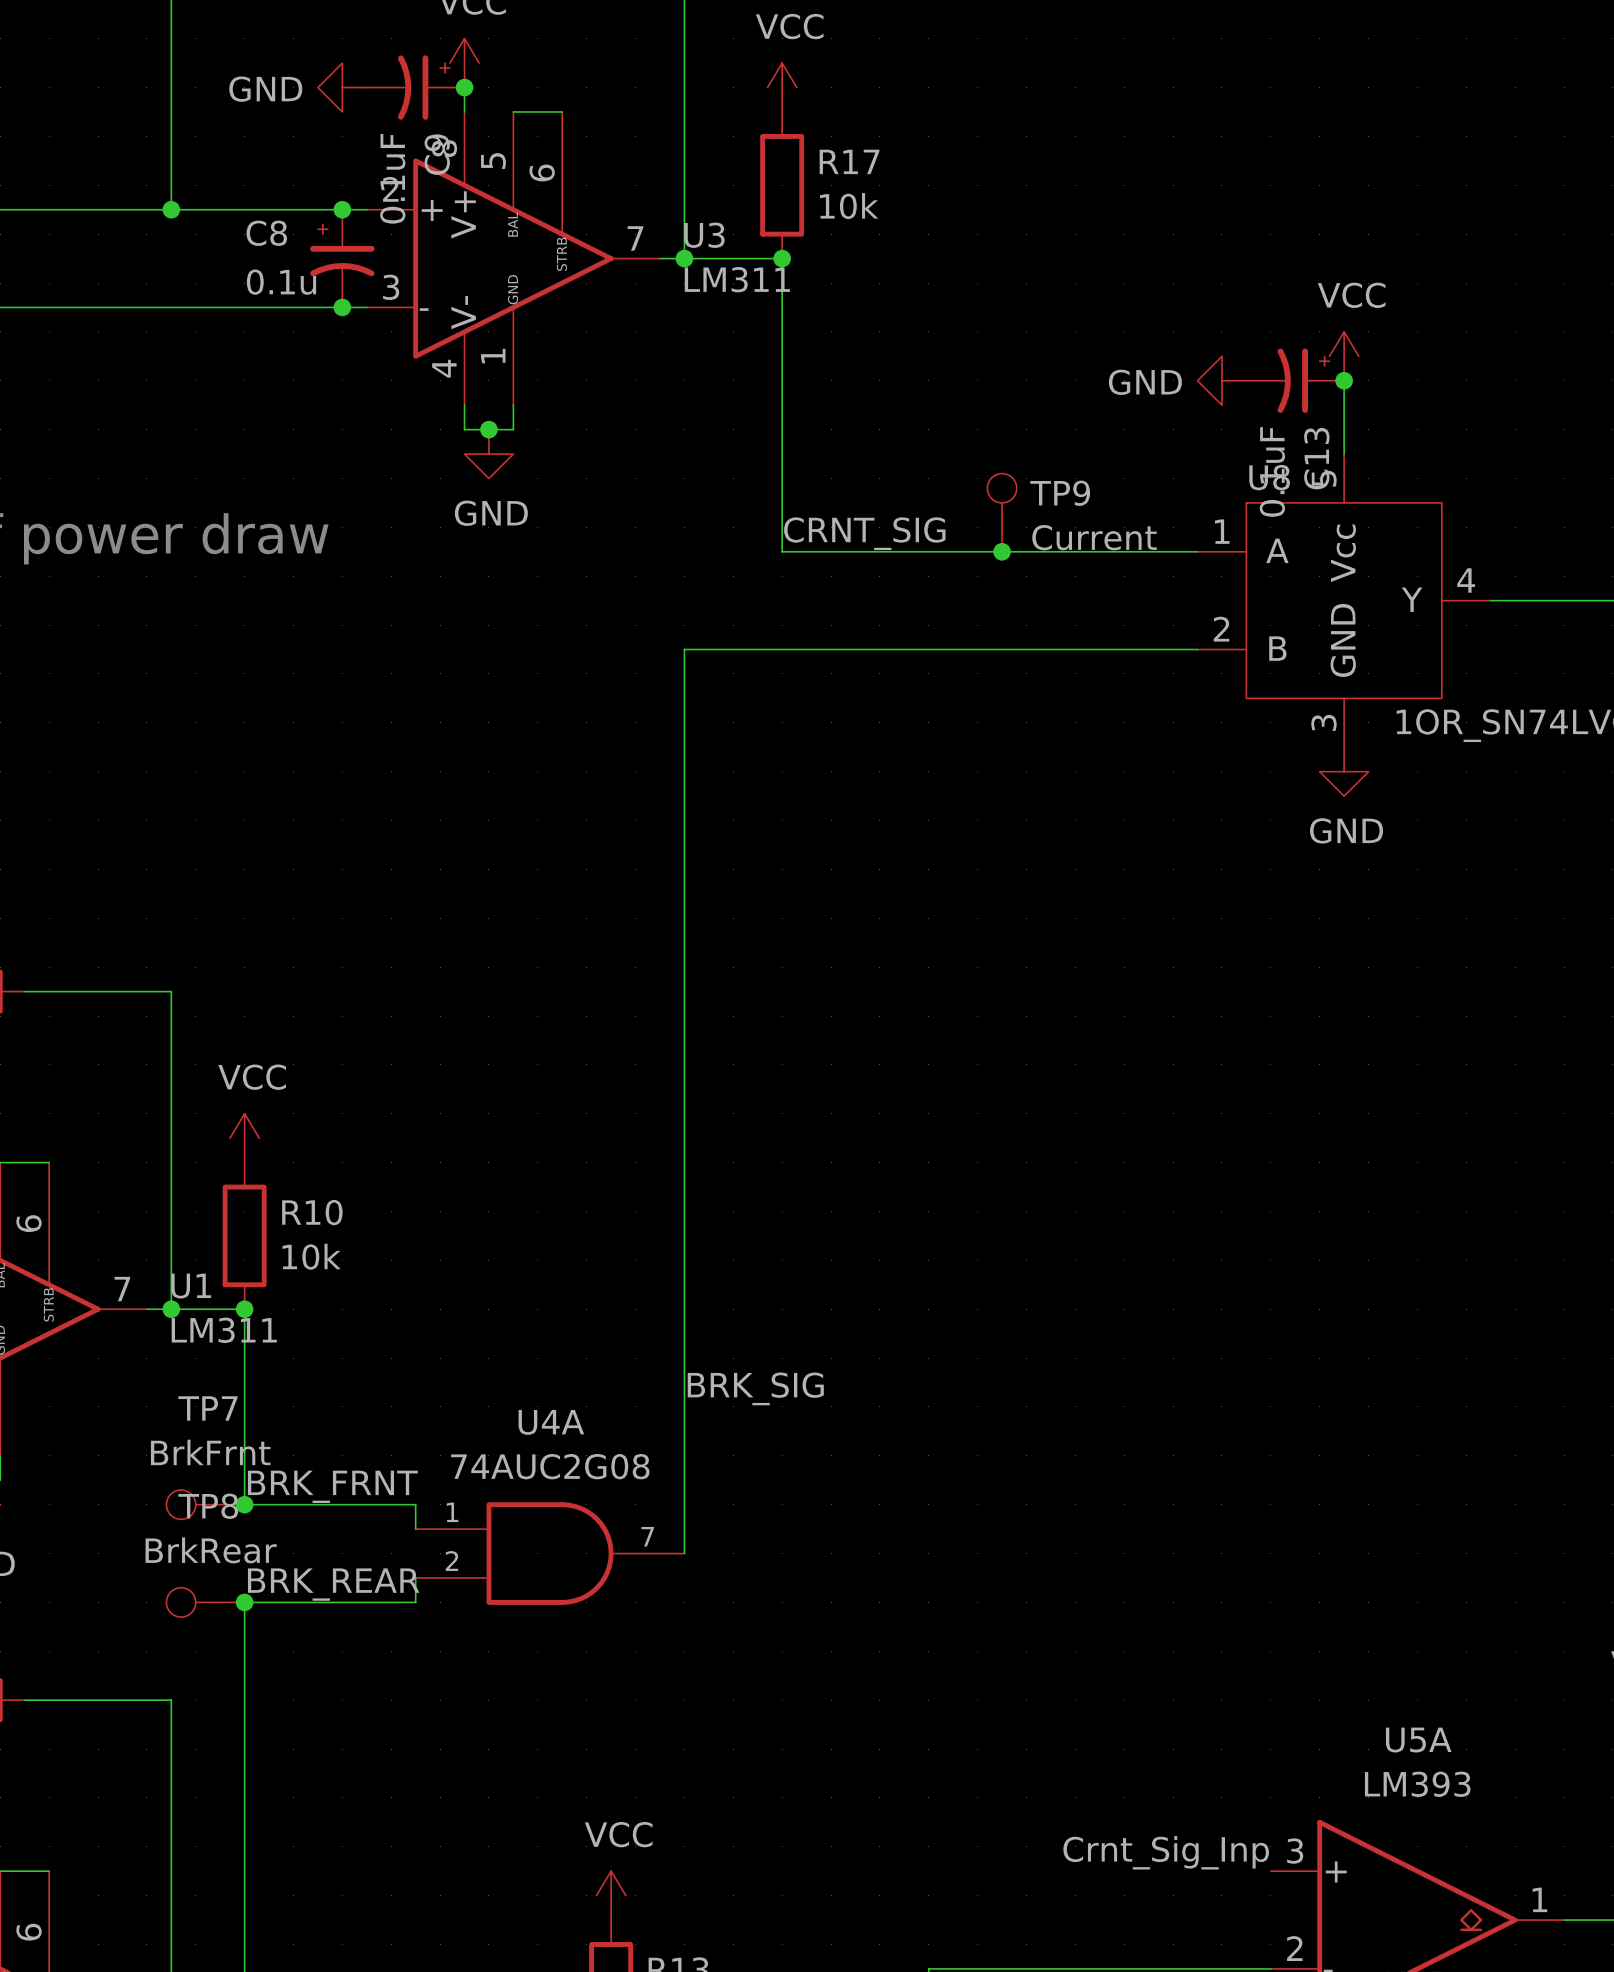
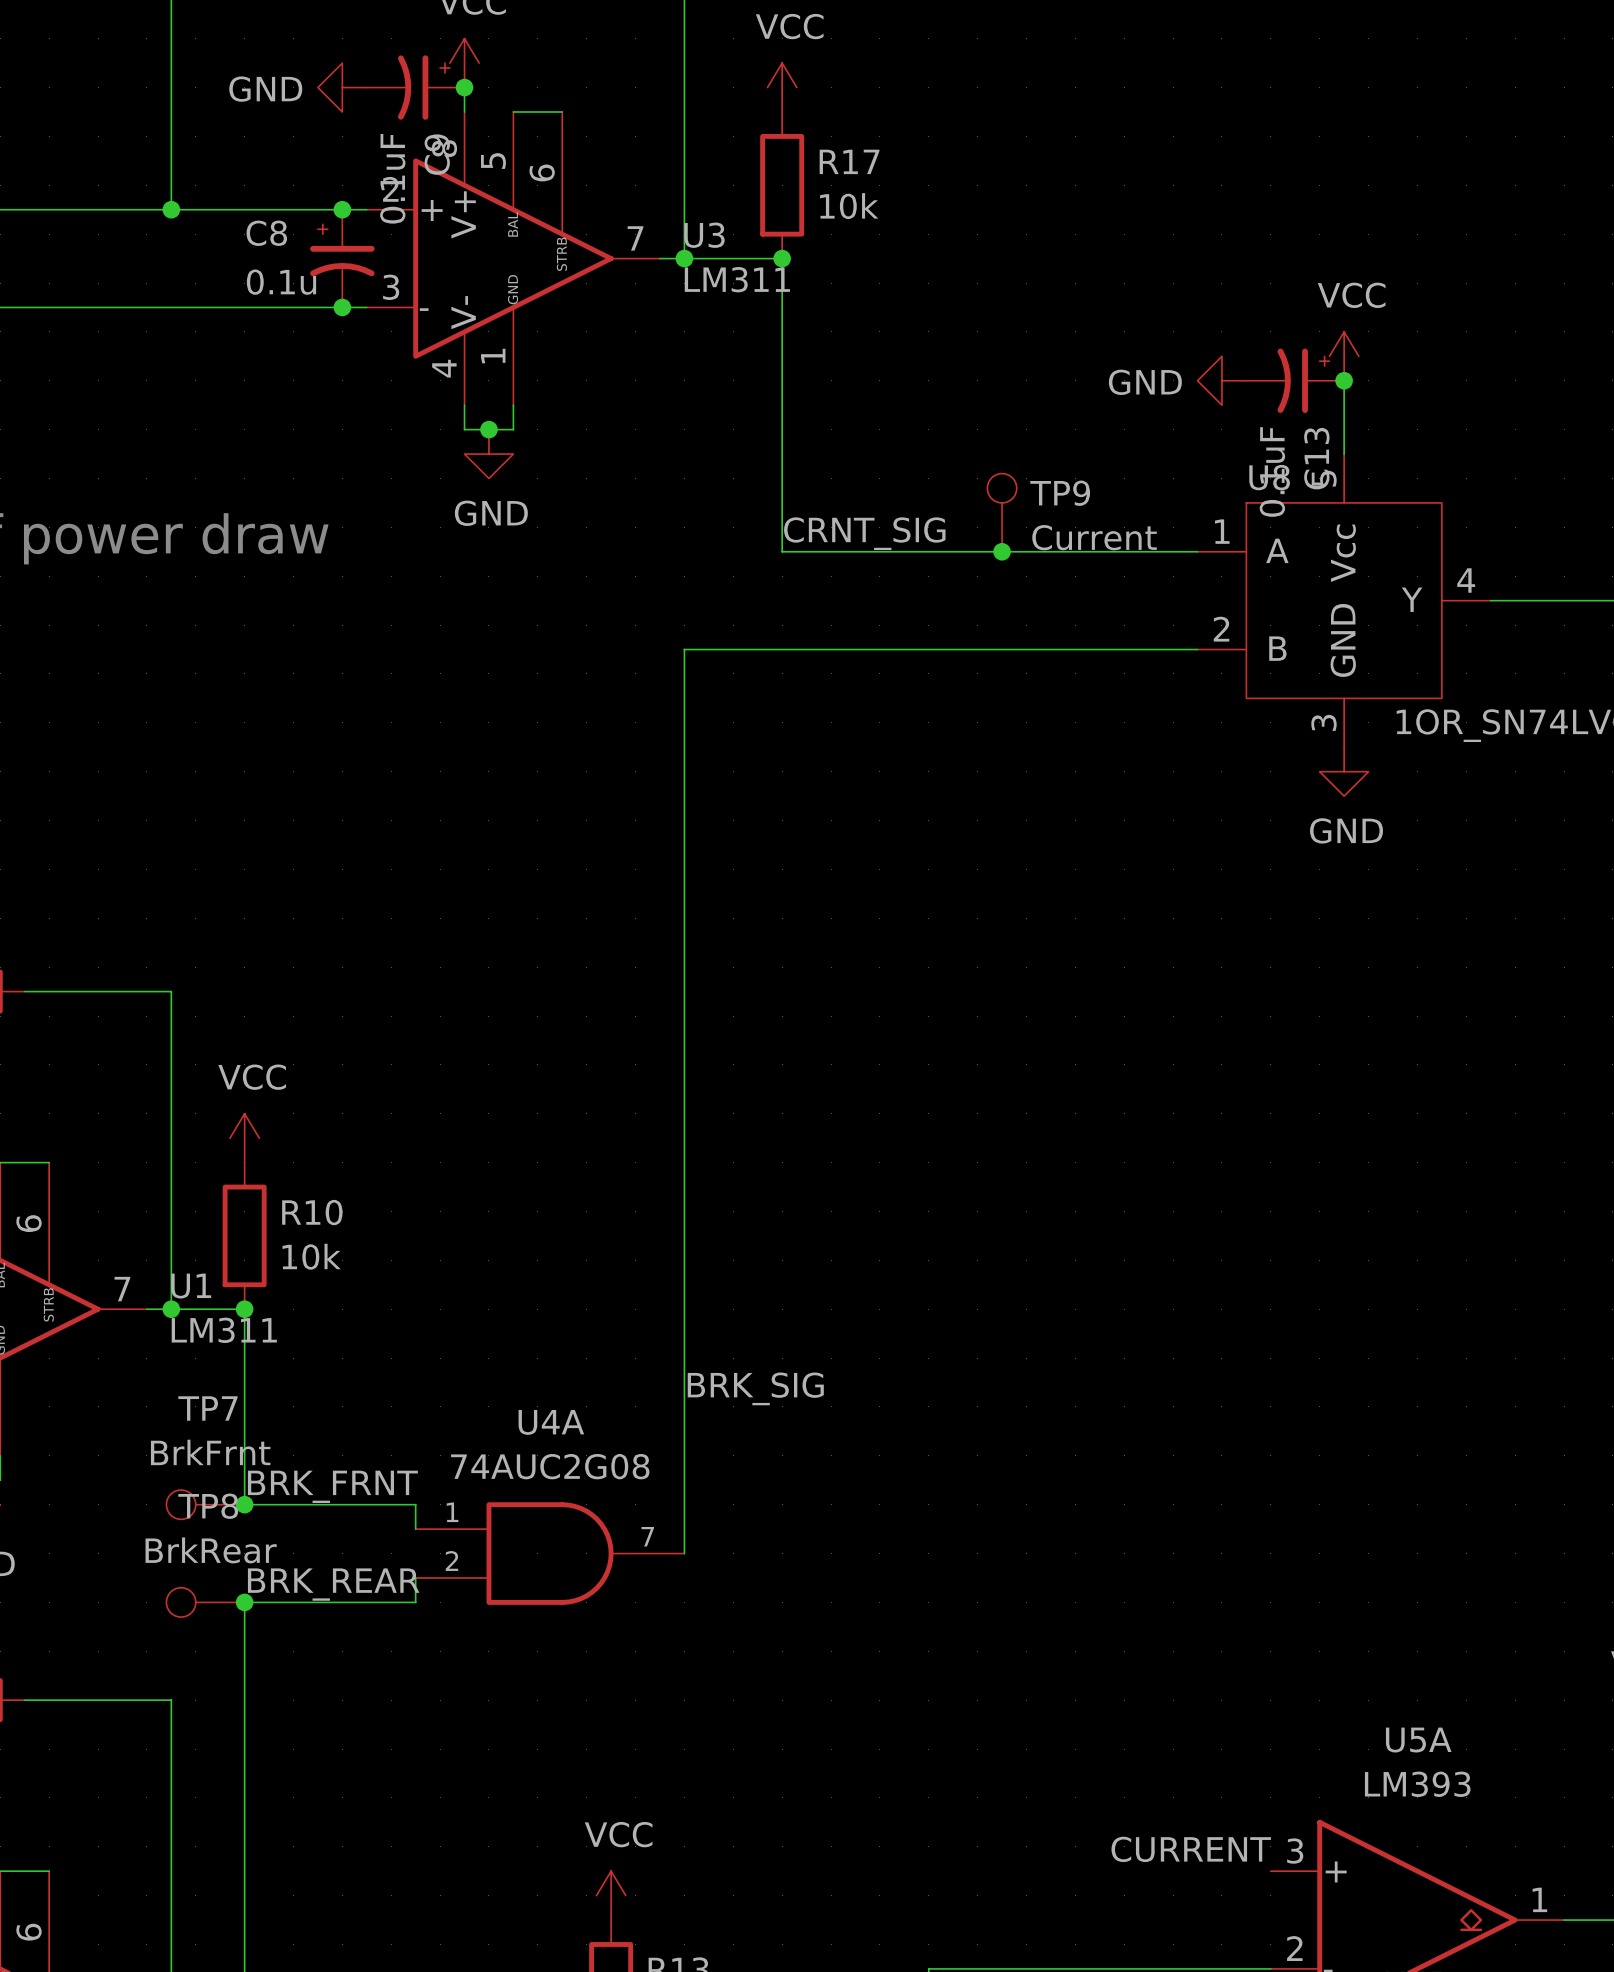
label: Crnt_Sig_Inp (1166, 1852) -> CURRENT (1191, 1849)

